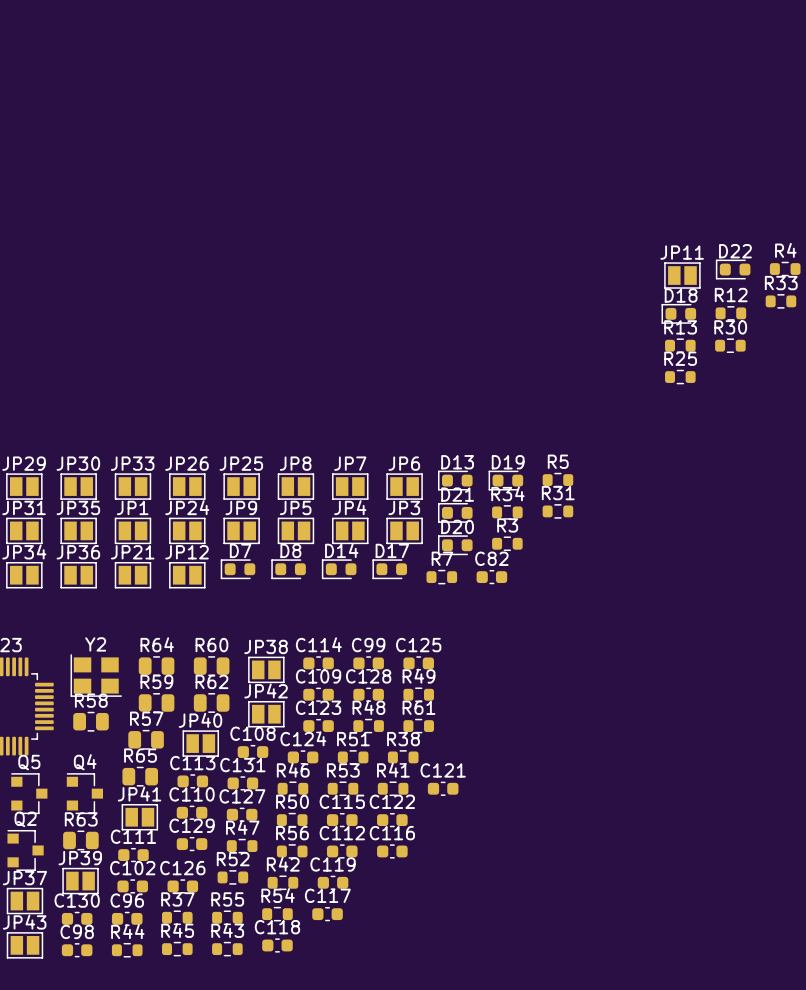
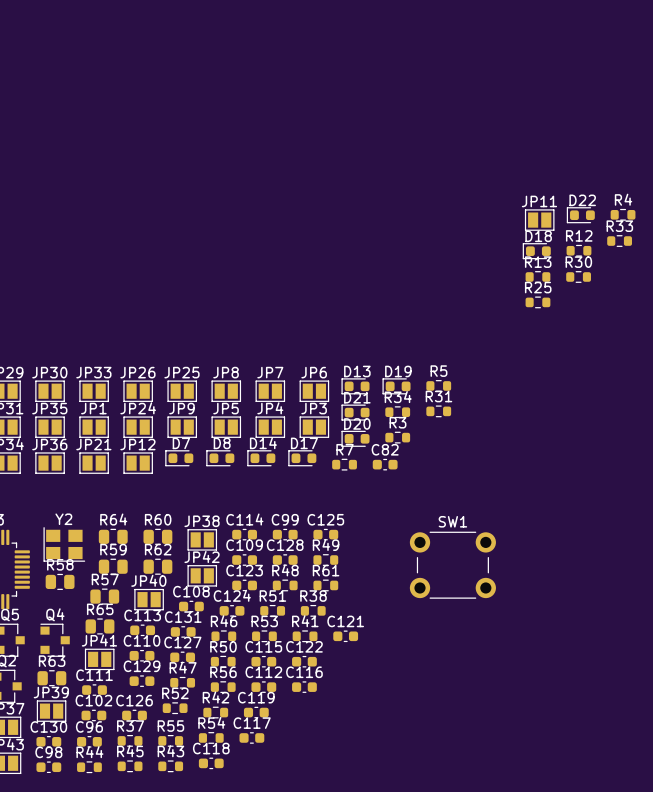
SW1: none -> (452, 565)

